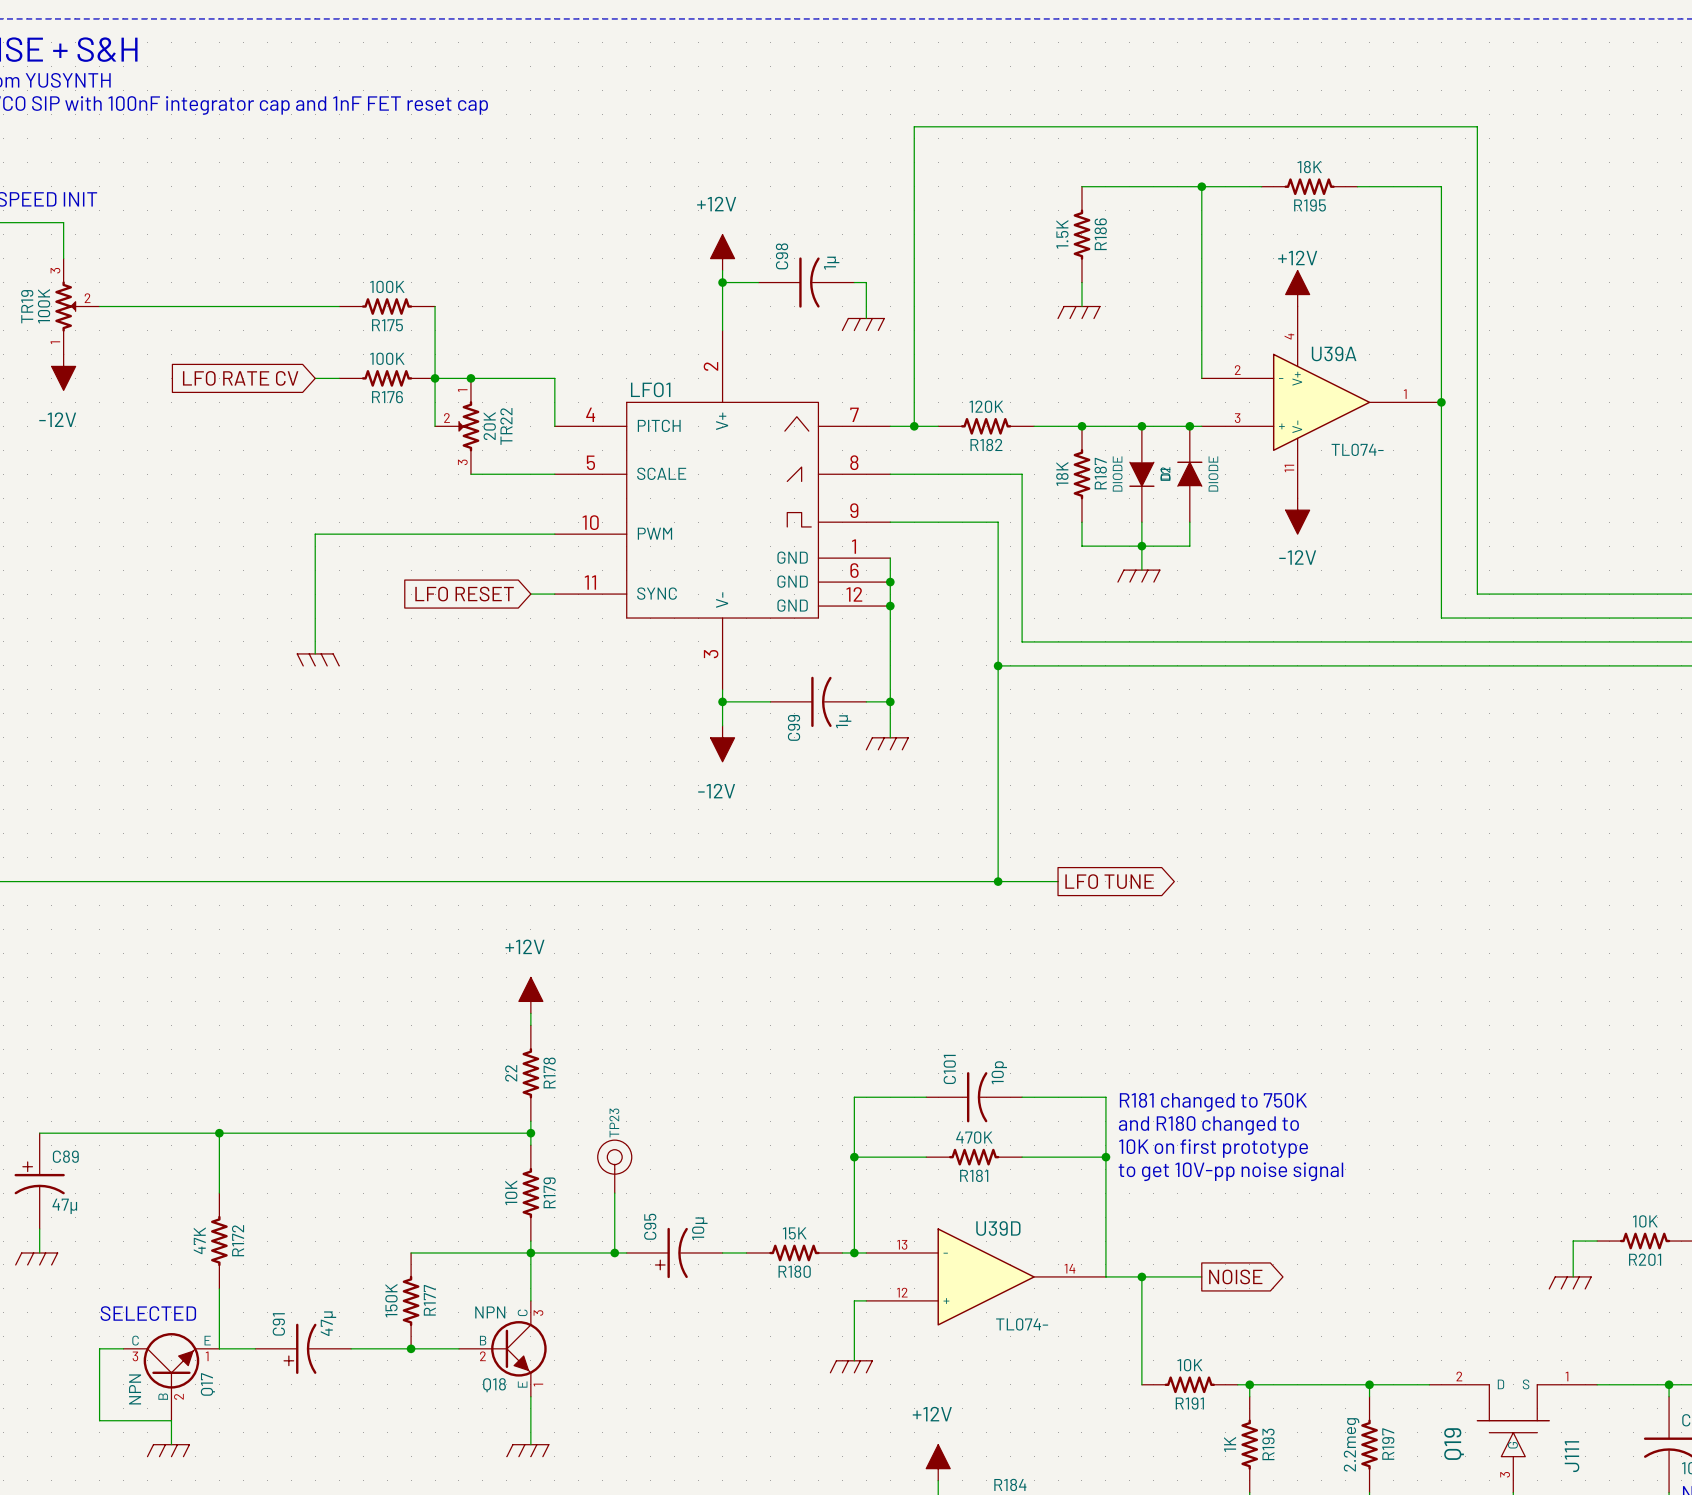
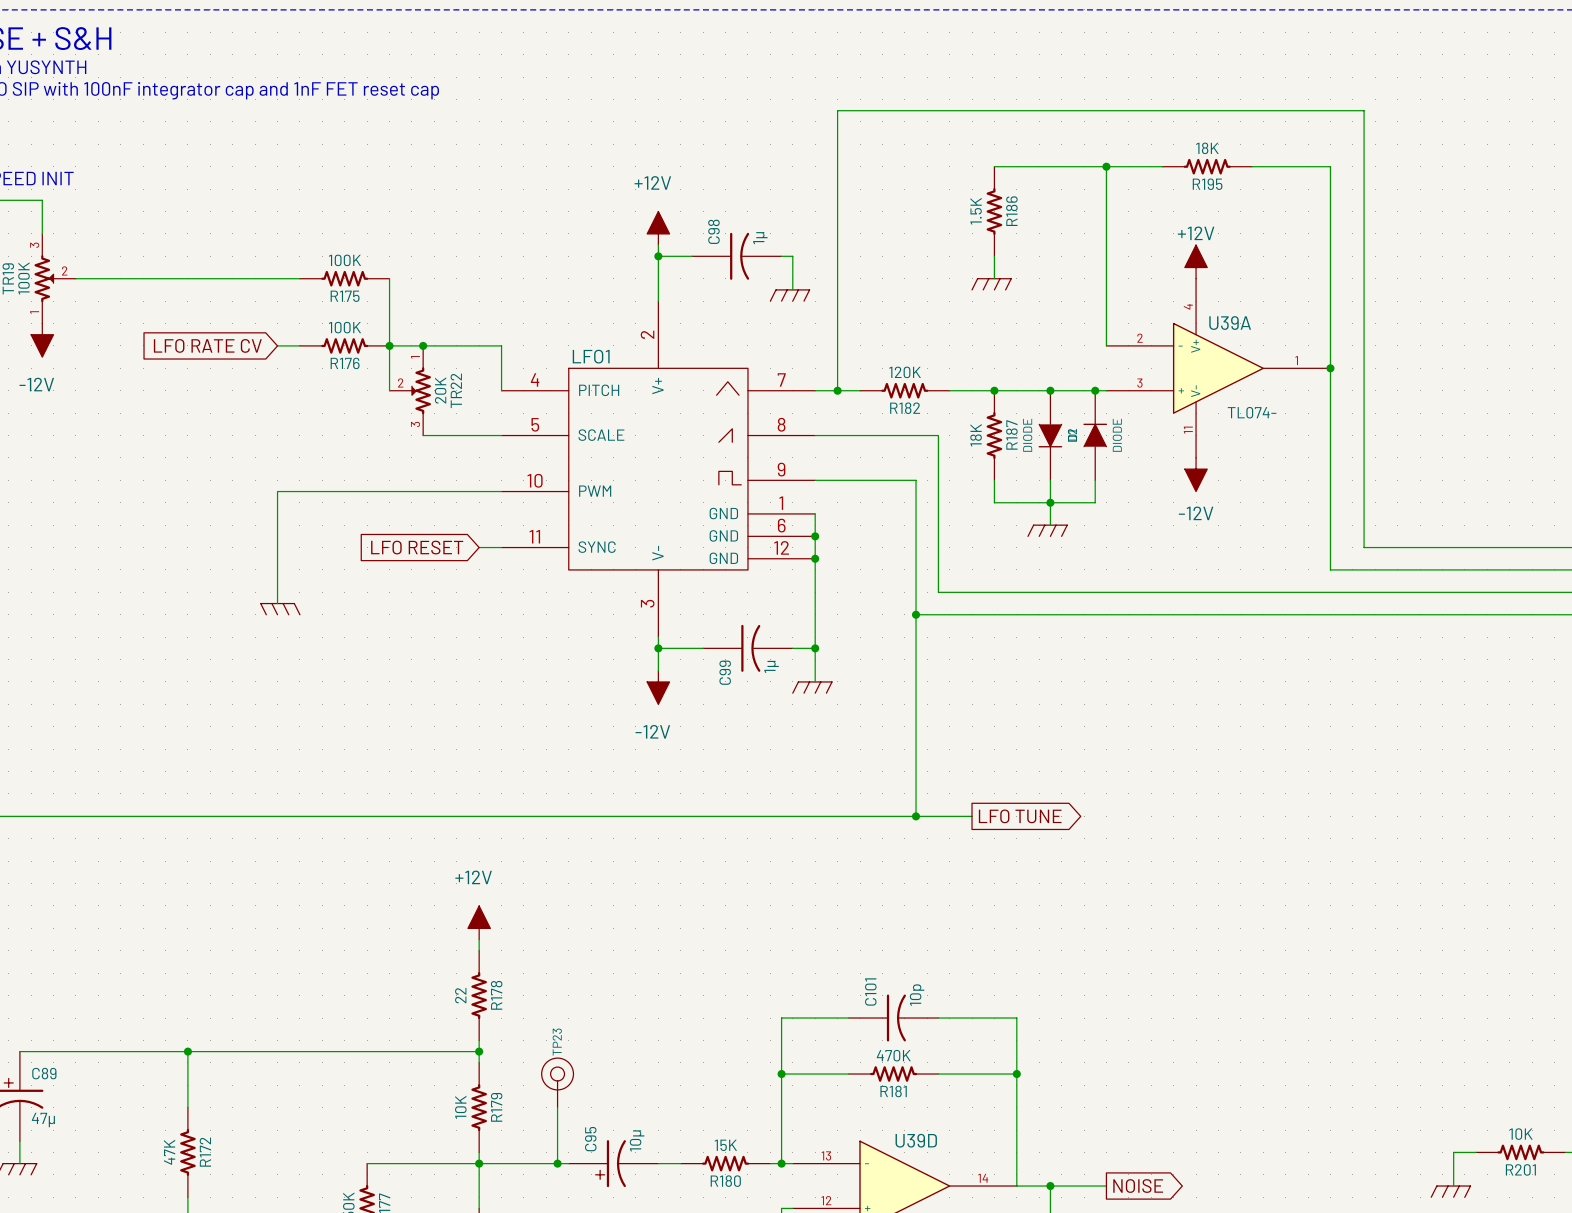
text: R181 changed to 750K (1213, 1102) -> none
text: and R180 changed to (1208, 1125) -> none
text: 10K on first prototype (1213, 1148) -> none
text: to get 10V-pp noise signal (1230, 1171) -> none

